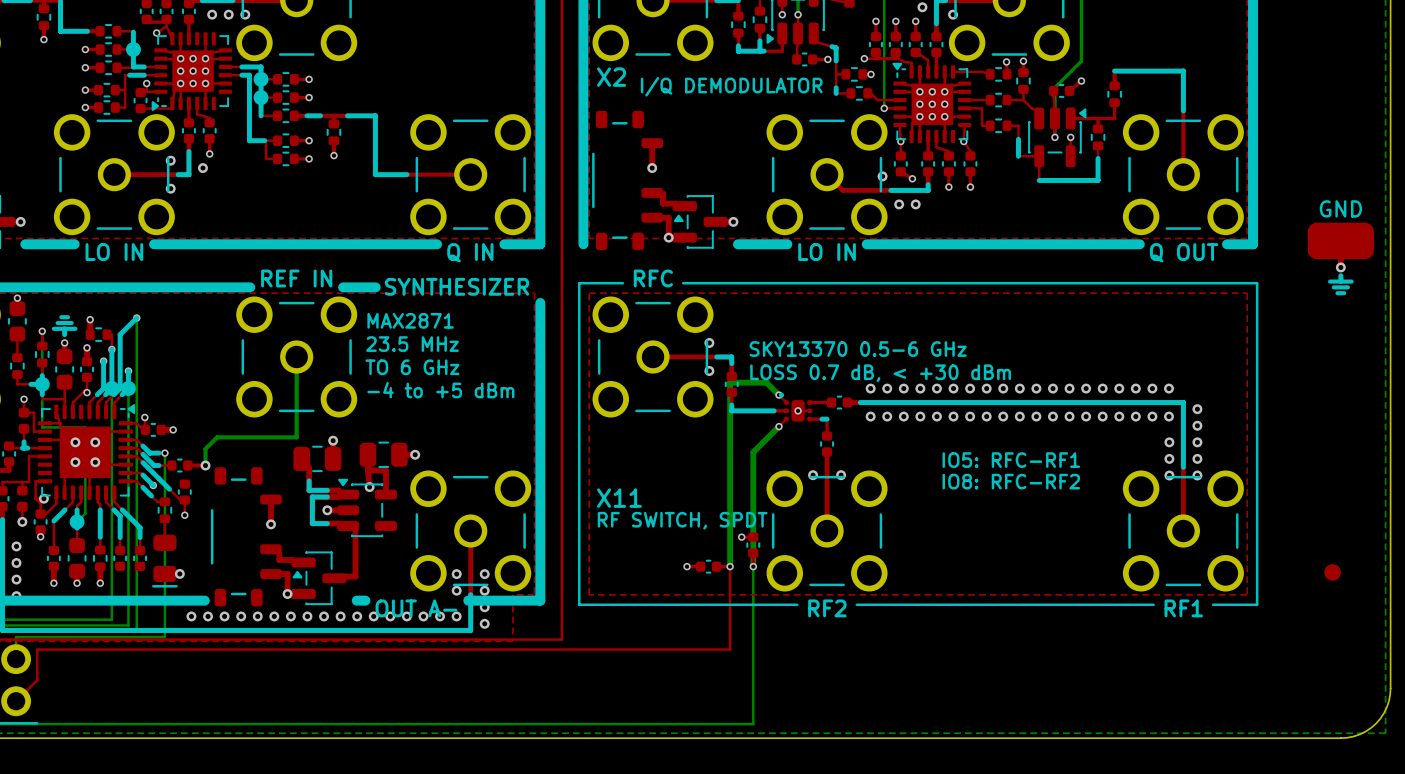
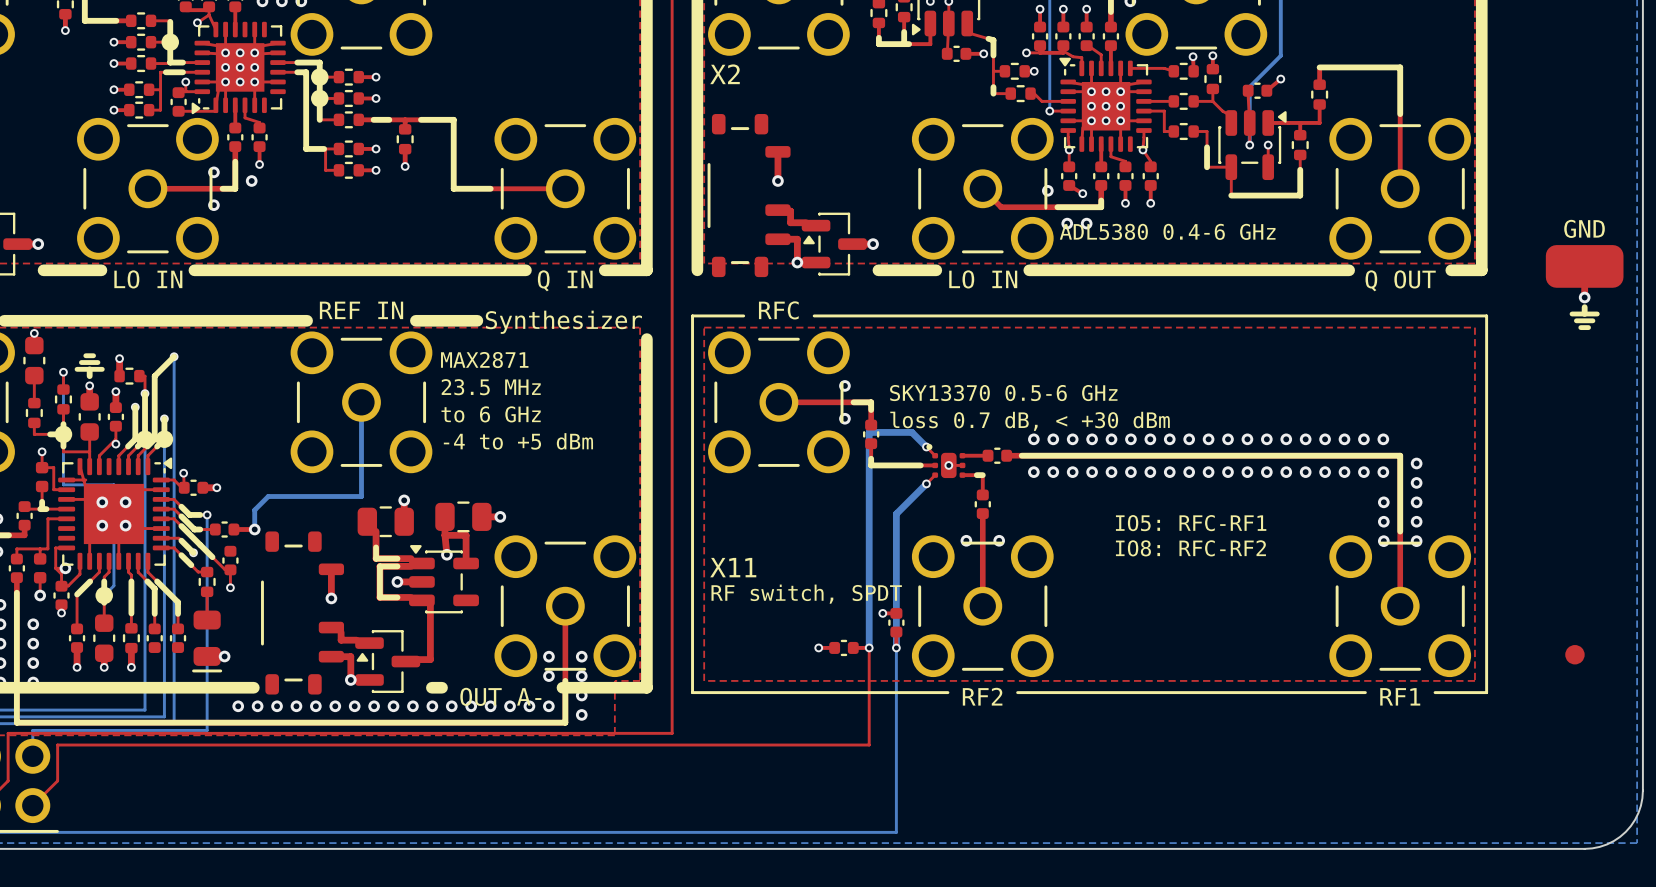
text: I/Q DEMODULATOR (731, 86) -> none
text: none -> ADL5380 0.4-6 GHz (1167, 231)
text: SYNTHESIZER (457, 286) -> none
line: none -> (454, 320) (477, 320)
text: none -> Synthesizer (563, 322)
text: TO 6 GHz (412, 367) -> to 6 GHz (491, 414)
text: LOSS 0.7 dB, < +30 dBm (880, 373) -> loss 0.7 dB, < +30 dBm (1030, 421)
text: RF SWITCH, SPDT (682, 520) -> RF switch, SPDT (806, 594)

